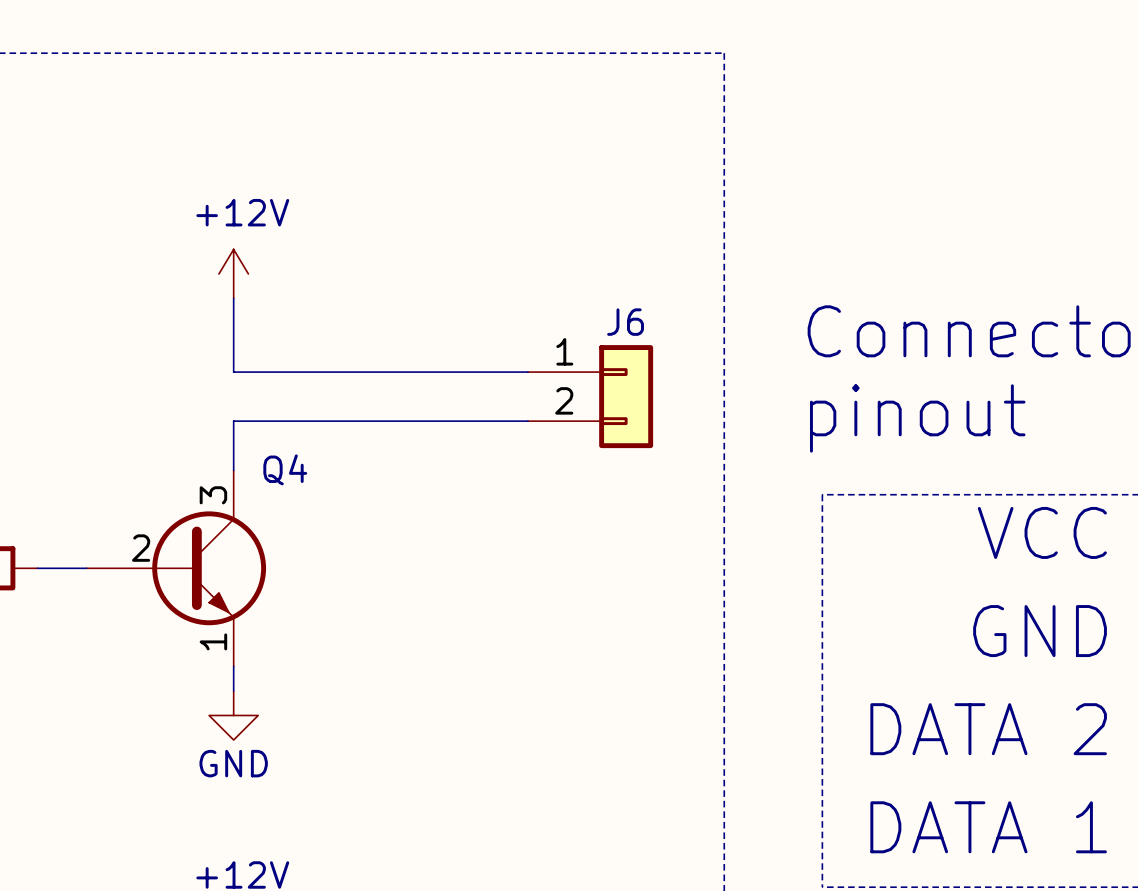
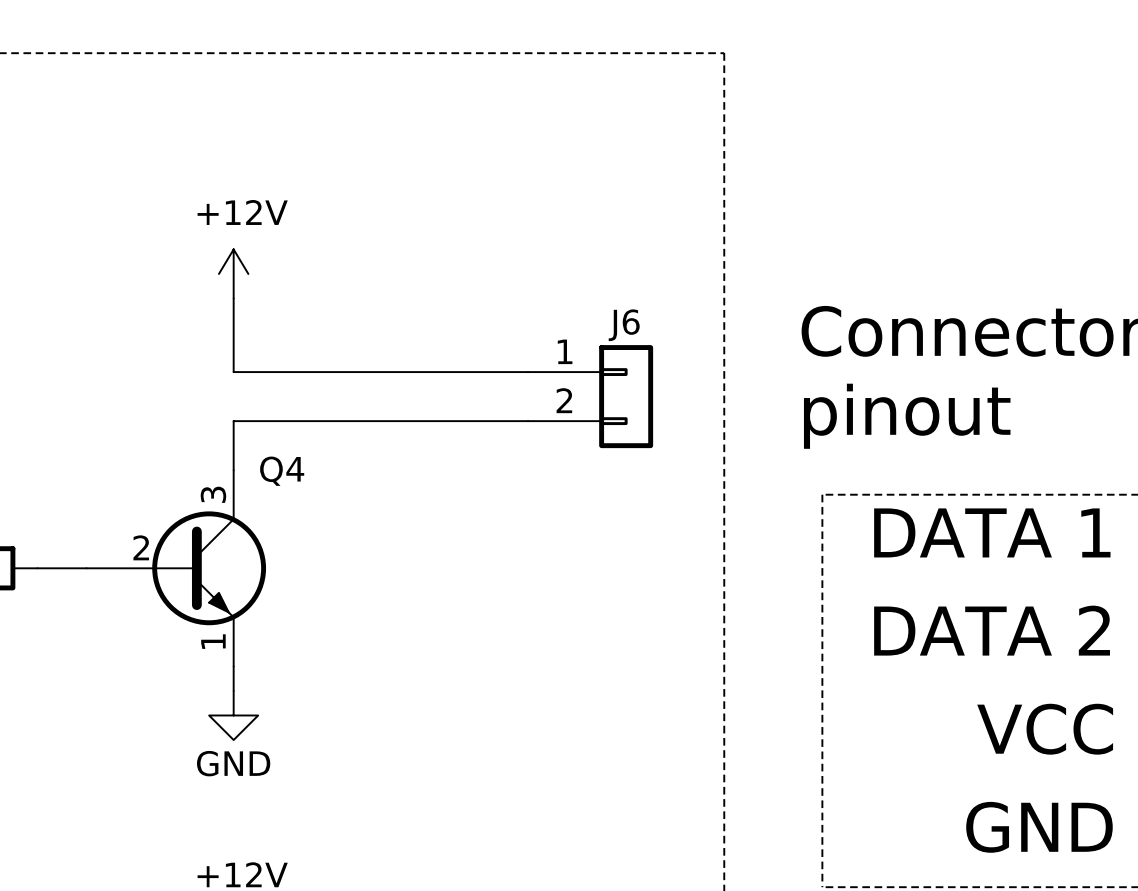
text: VCC (1042, 532) -> DATA 1 (992, 532)
text: GND (1040, 631) -> DATA 2 (992, 630)
text: DATA 2 (988, 729) -> VCC (1045, 729)
text: DATA 1 (988, 827) -> GND (1039, 827)

